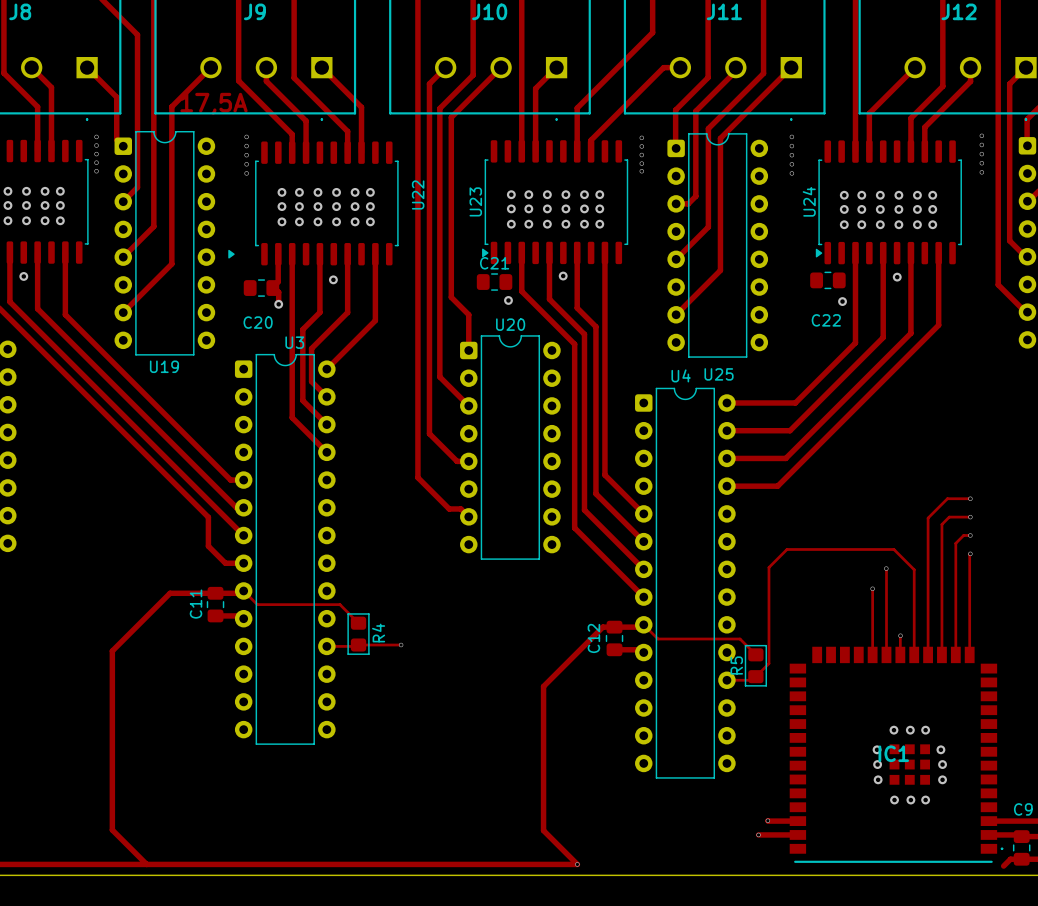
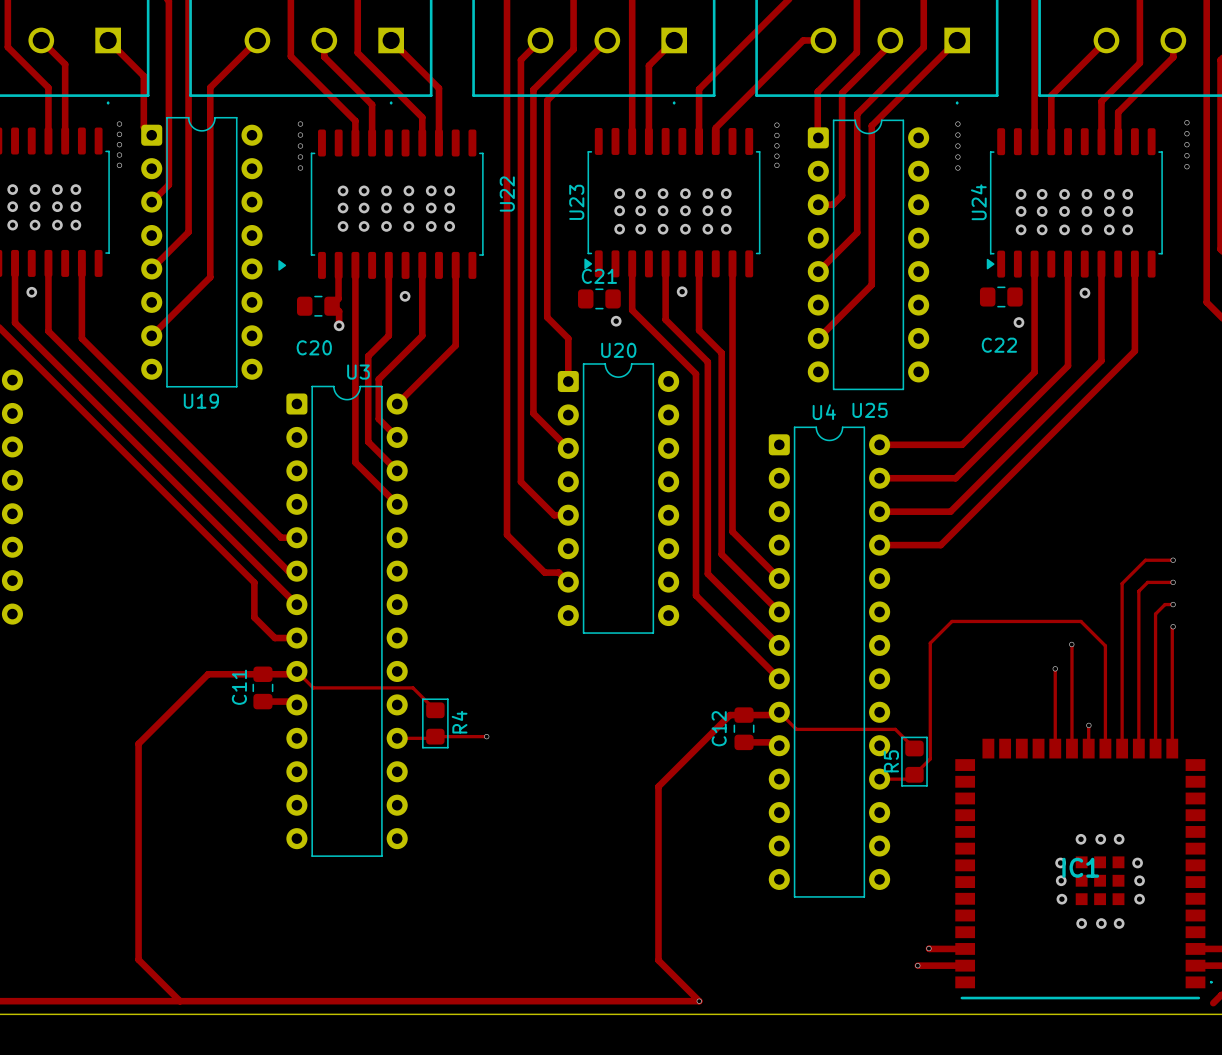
text: 17,5A (214, 103) -> none

